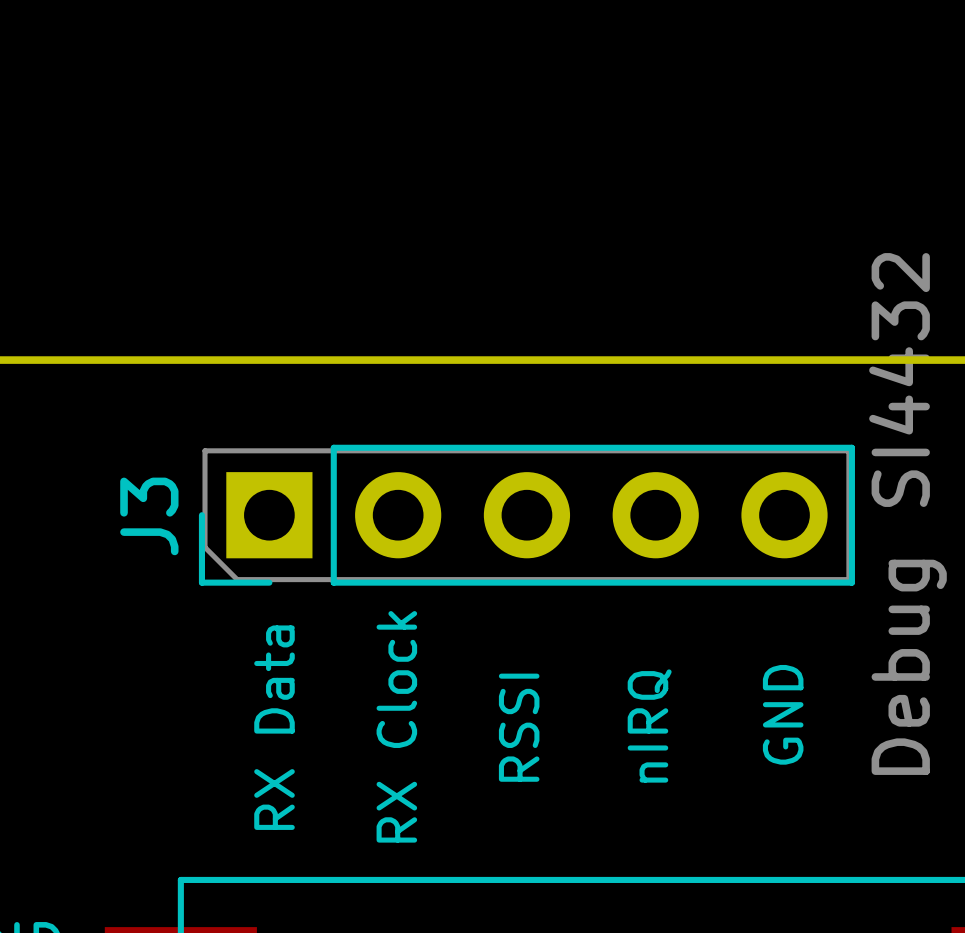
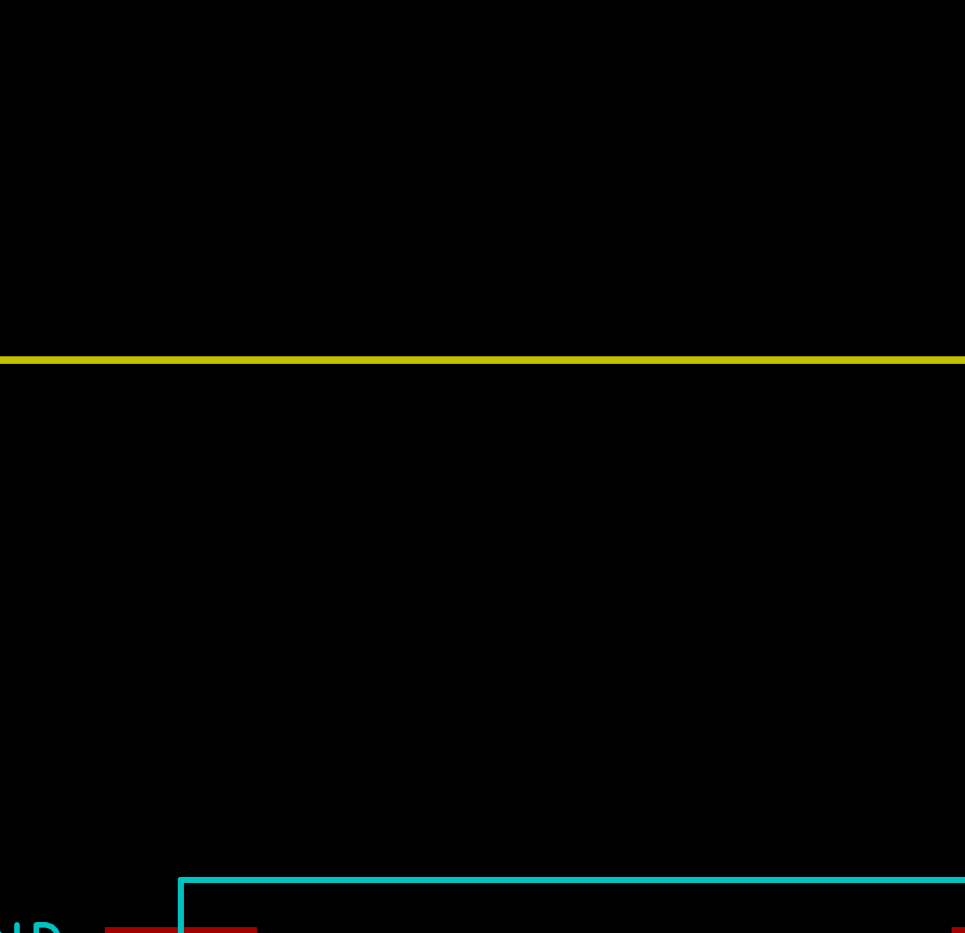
J3: Debug SI4432 (526, 515) -> none
text: GND (783, 714) -> none
text: RX Clock (396, 726) -> none
text: nIRQ (649, 726) -> none
text: RX Data (274, 727) -> none
text: RSSI (519, 727) -> none

